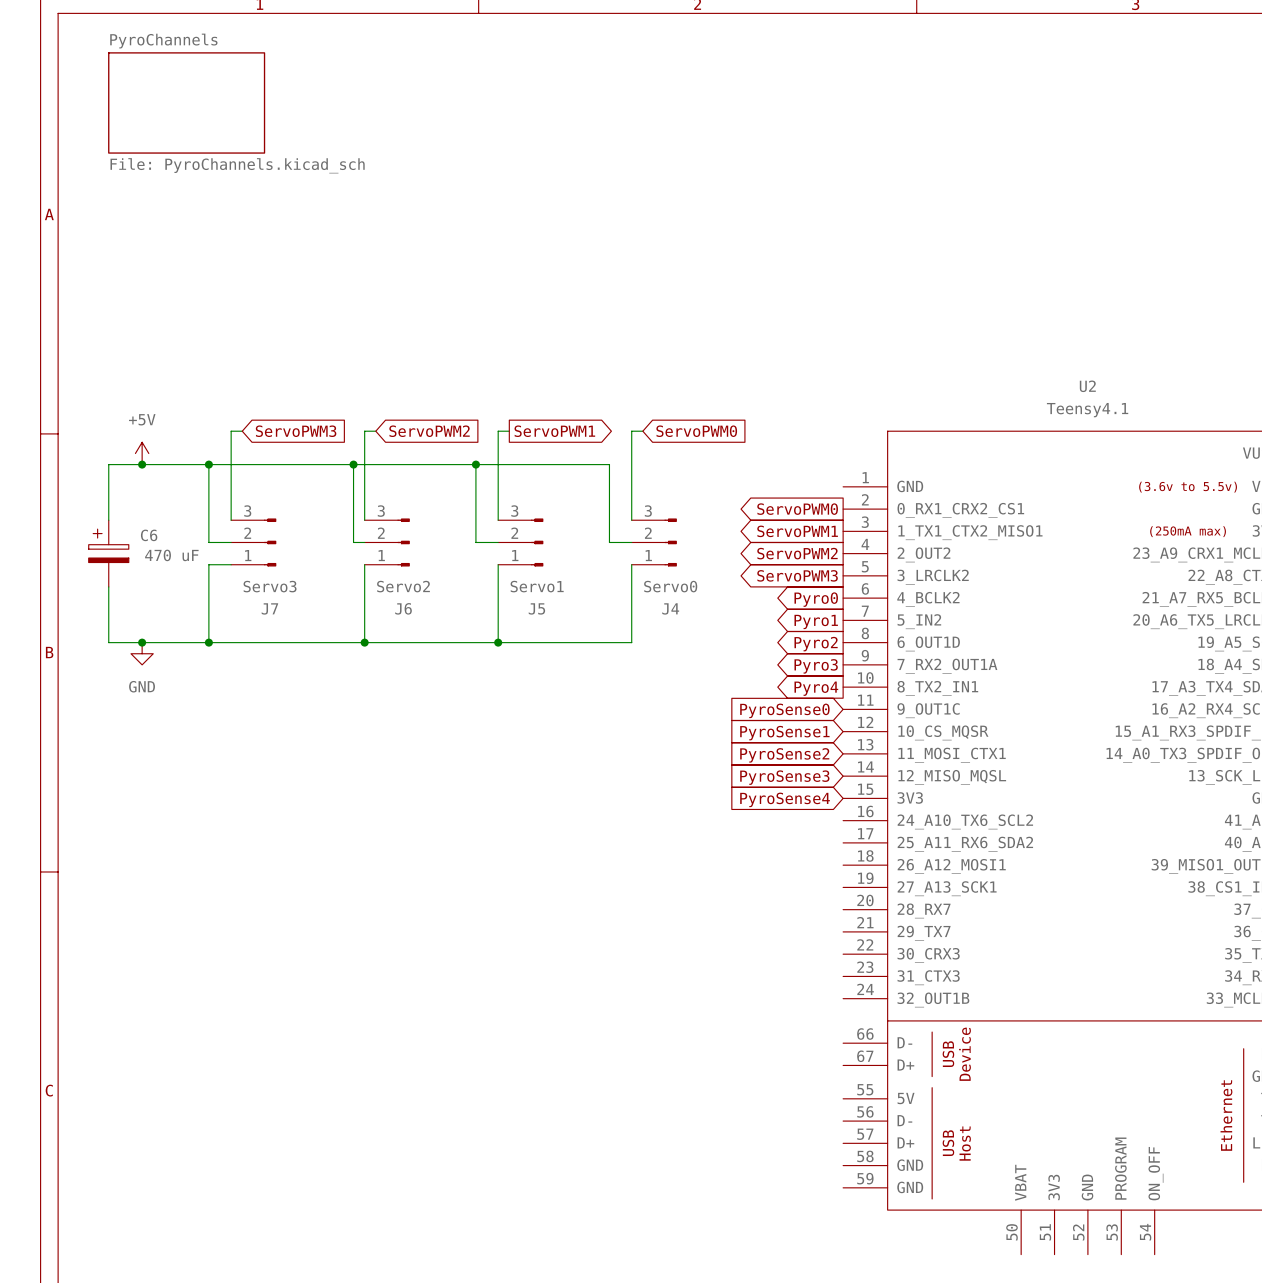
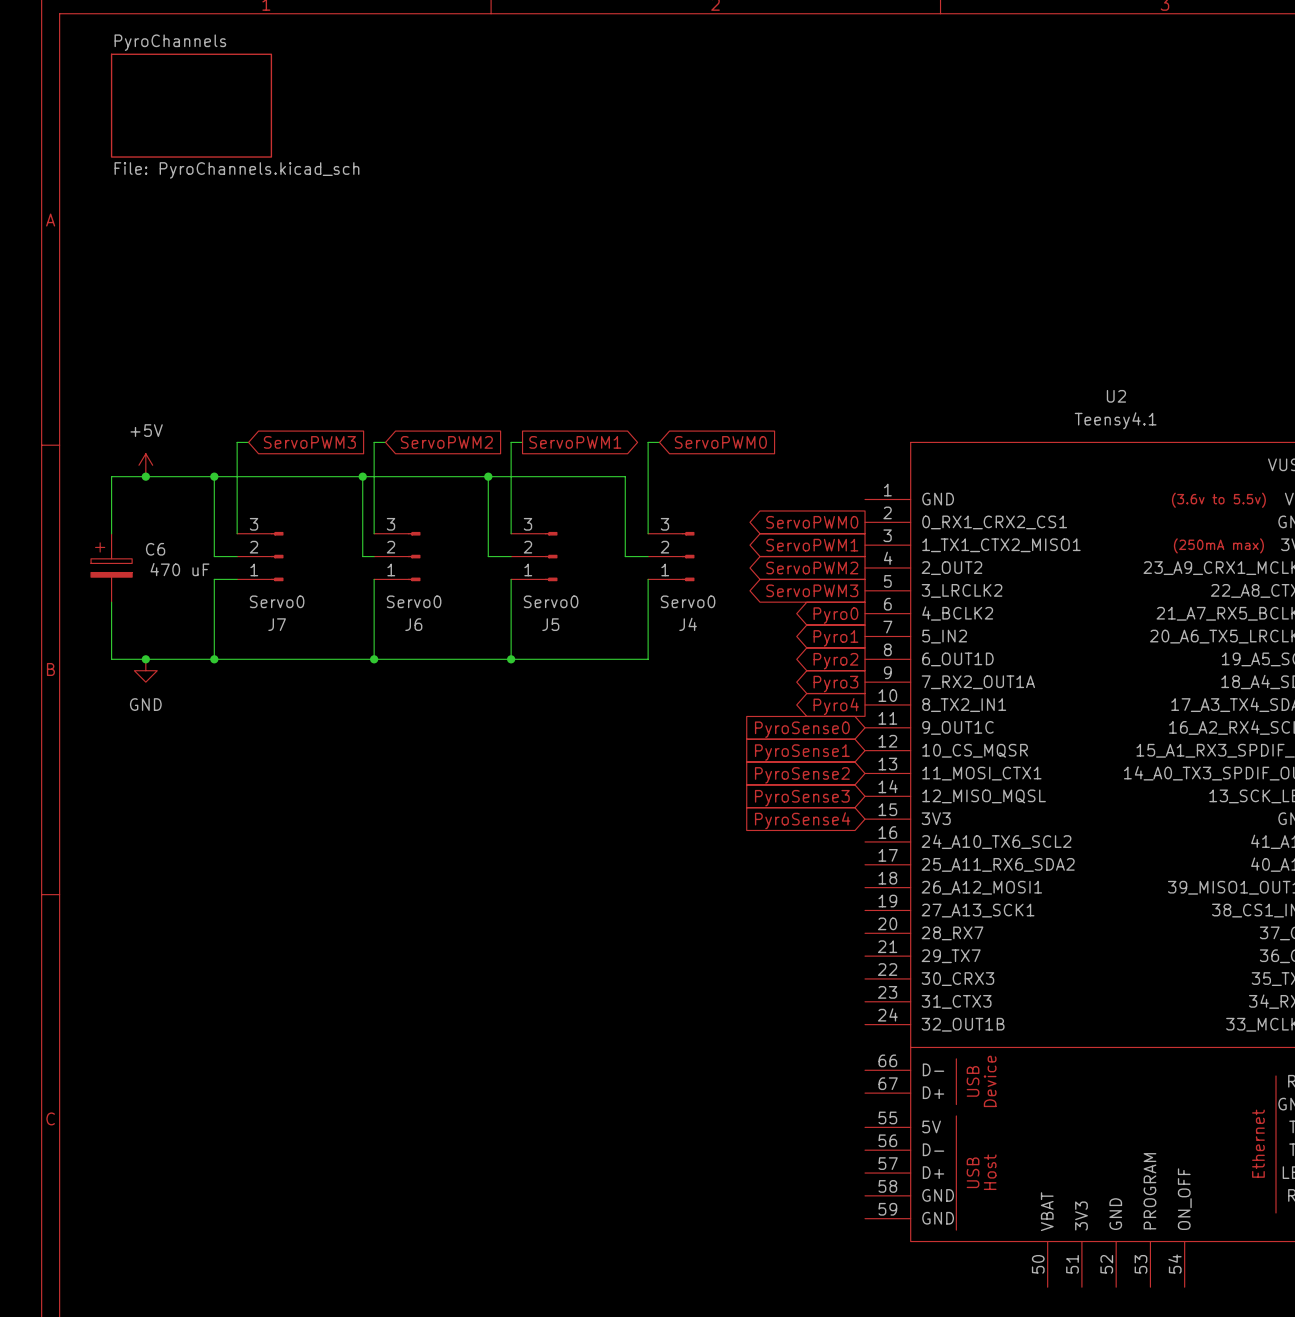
J7 value: Servo3 (270, 586) -> Servo0 (277, 601)
J6 value: Servo2 (403, 586) -> Servo0 (414, 601)
J5 value: Servo1 (537, 586) -> Servo0 (551, 601)

